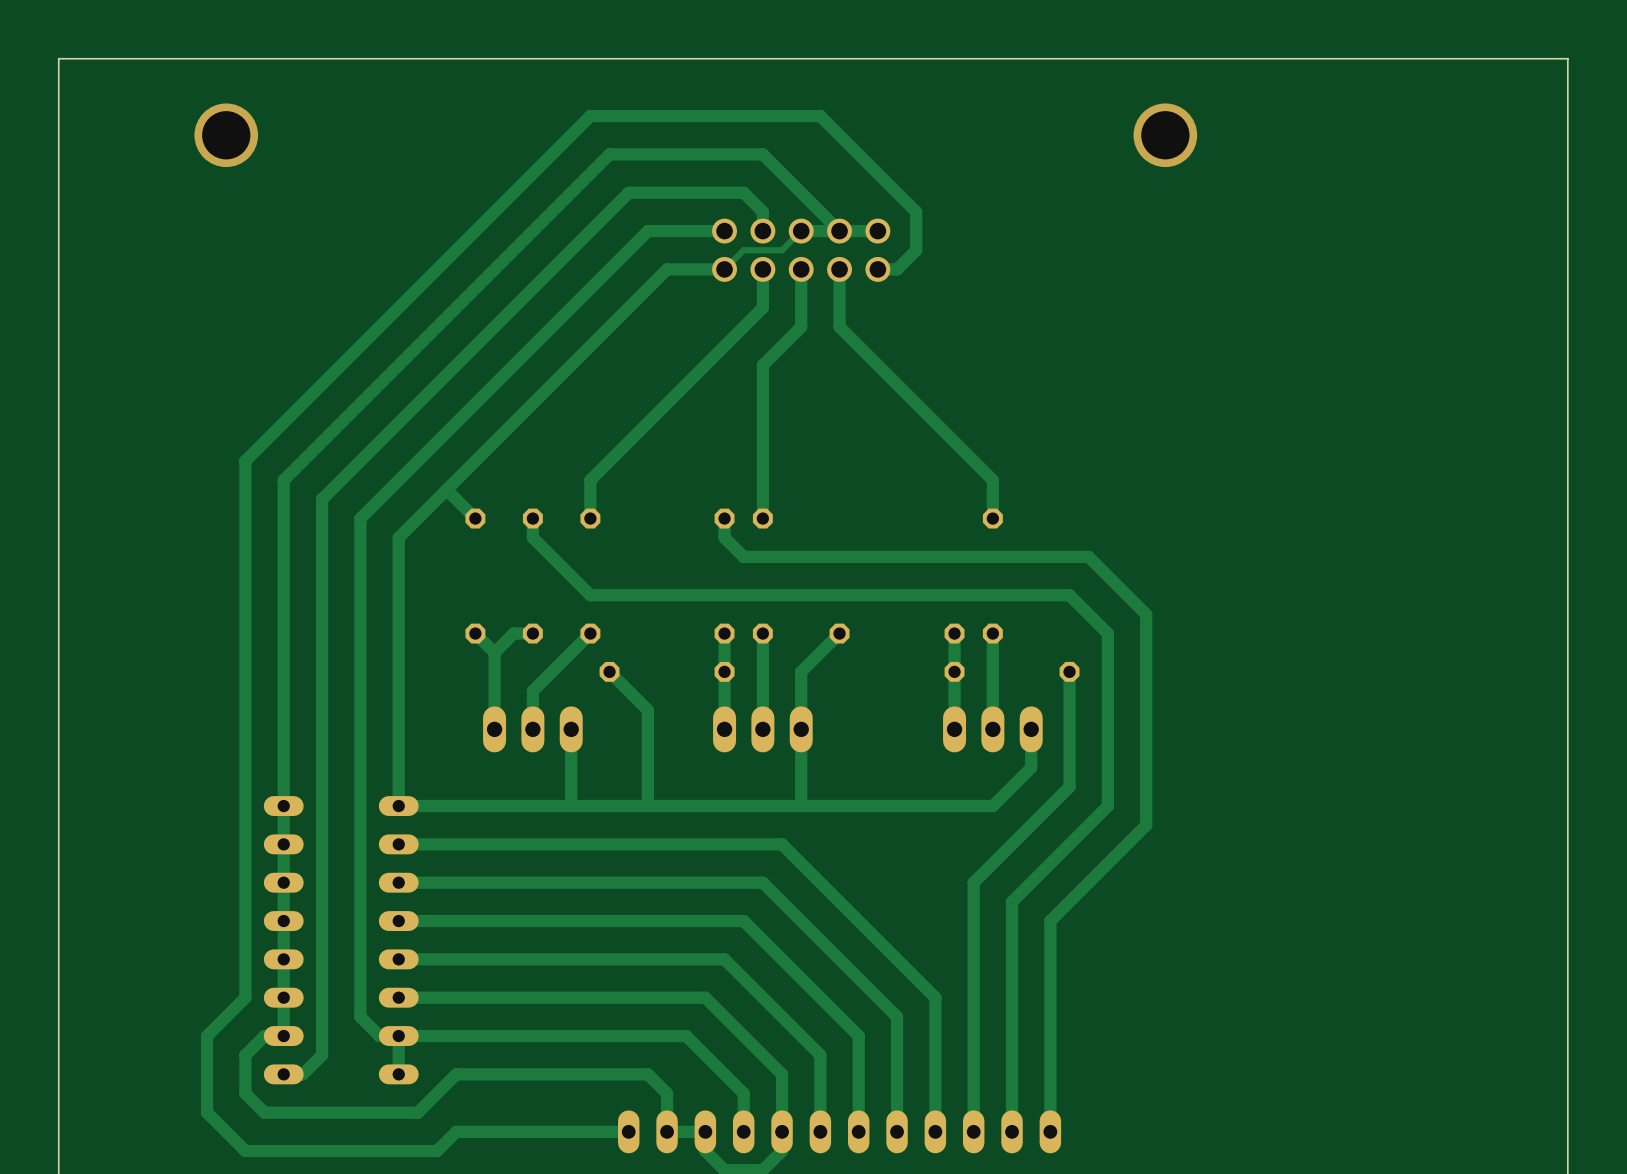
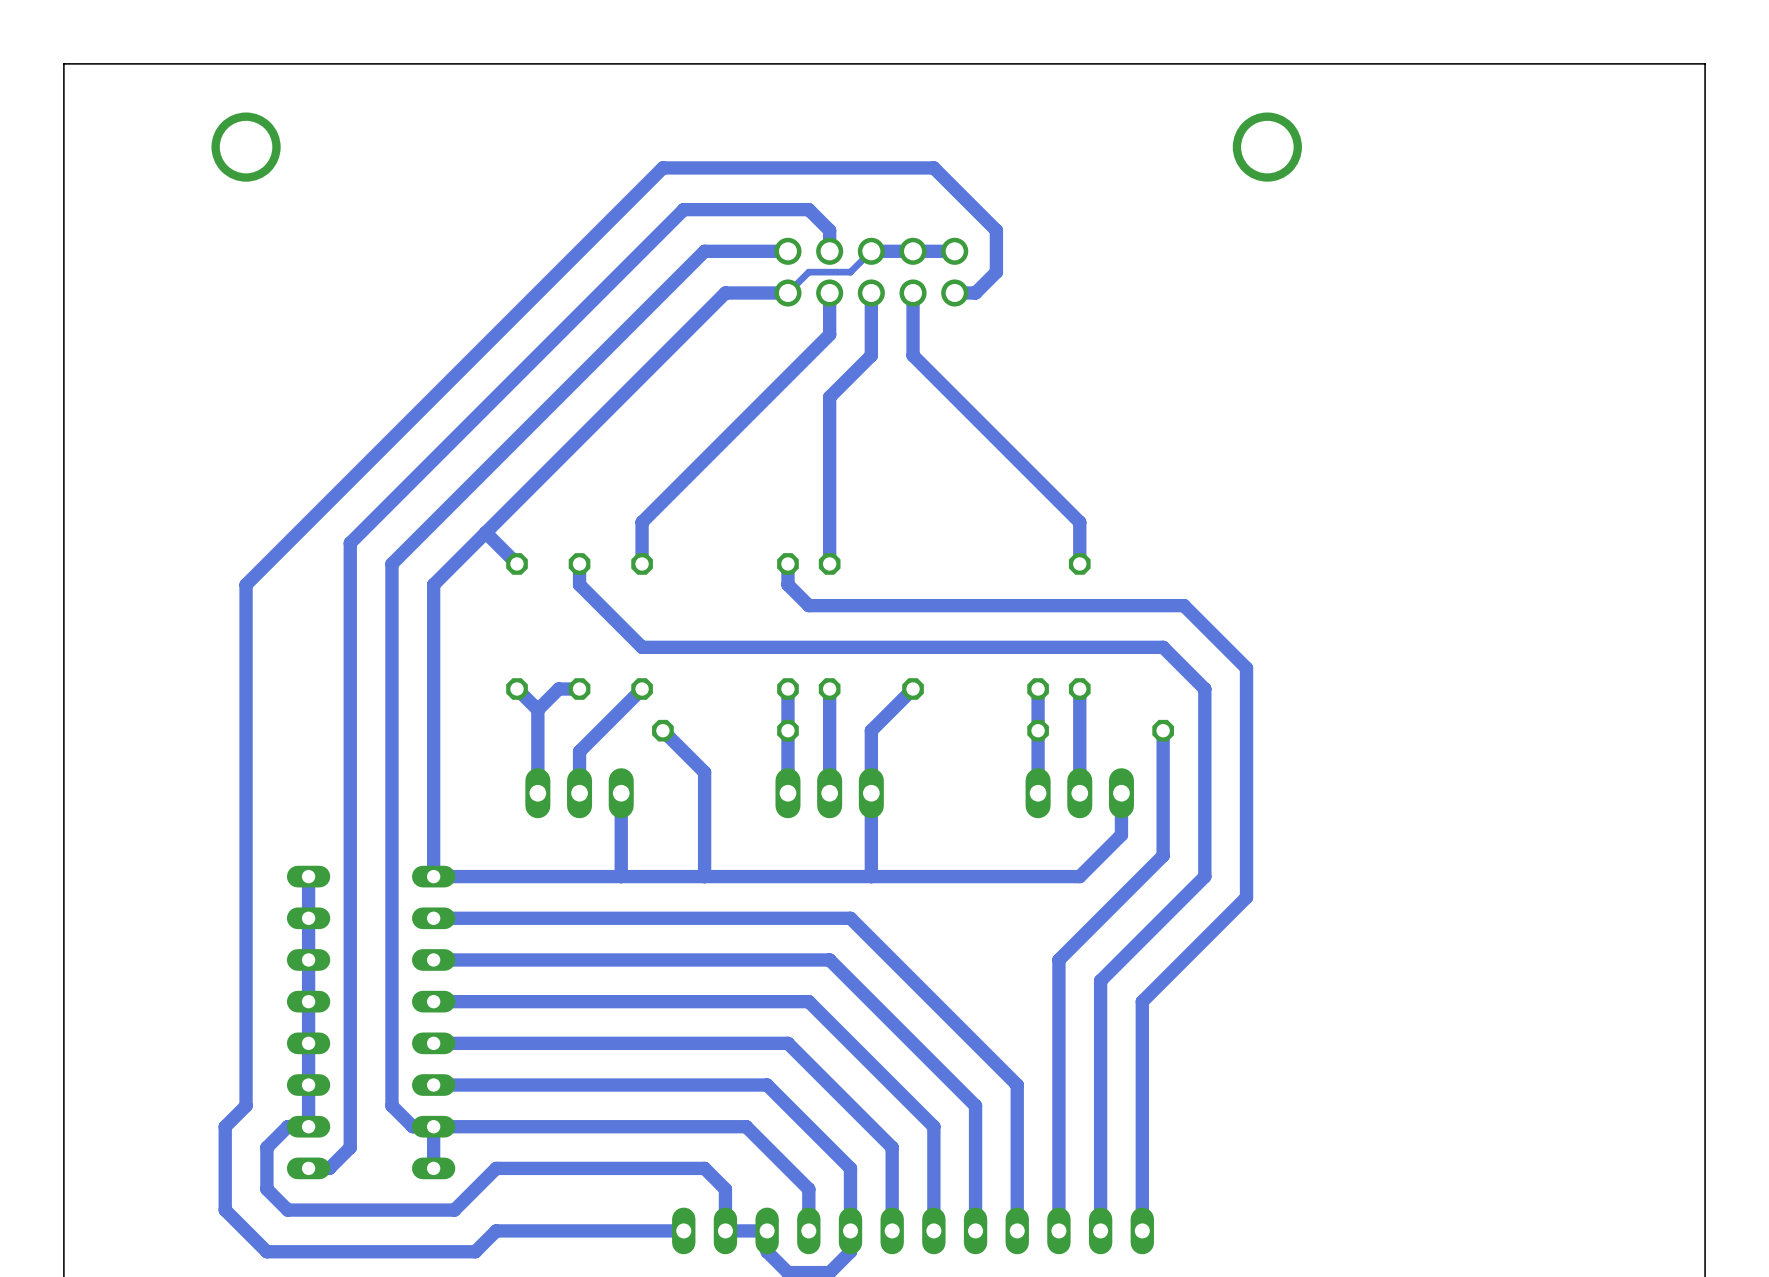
track: (762, 154) (839, 231) -> (829, 167) (933, 167)
track: (858, 154) (820, 116) (590, 116) (245, 461) (245, 997) (226, 1016) -> none
track: (283, 480) (283, 806) -> (308, 522) (246, 584) (246, 1105)

